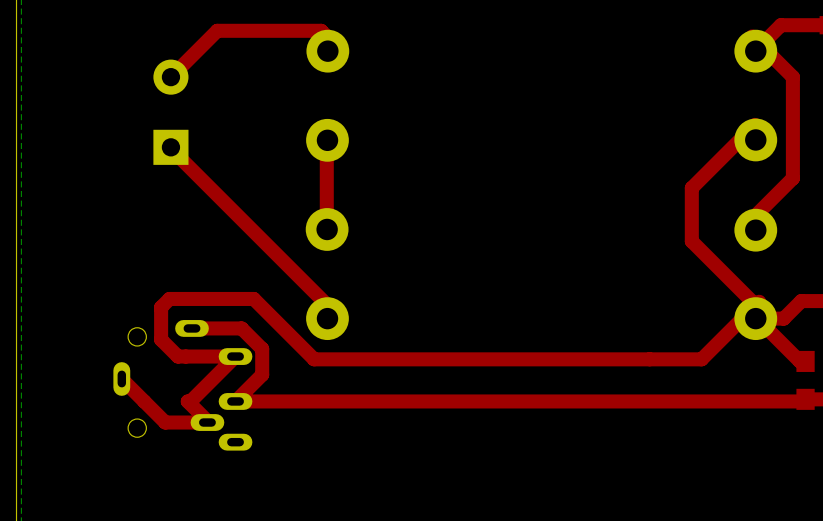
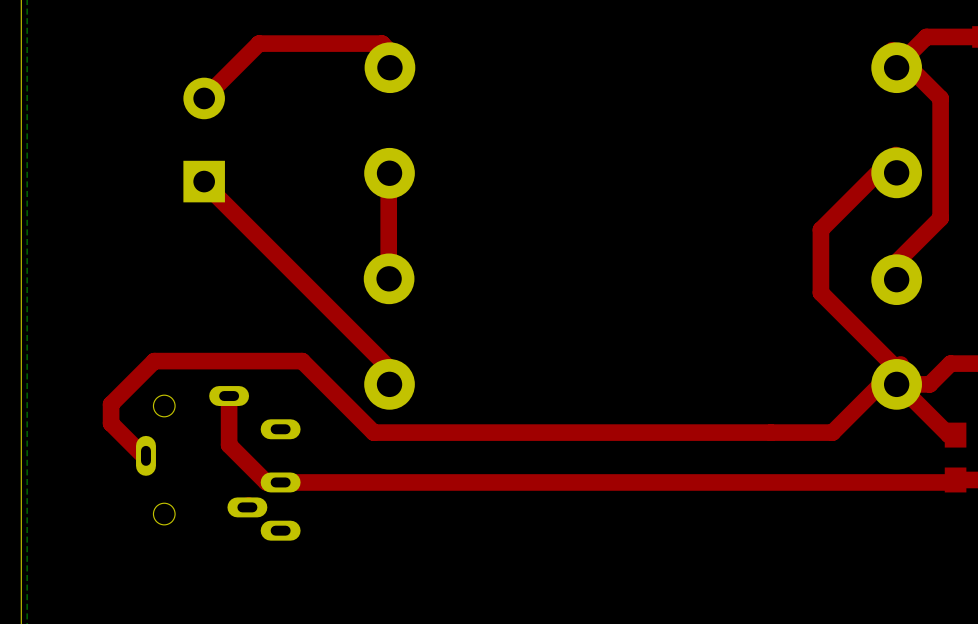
top track: (169, 298) (161, 307) (161, 339) (177, 356) (235, 356) (190, 401) (187, 401) (207, 421) -> (202, 361) (154, 361) (111, 404) (111, 423) (144, 456)
top track: (189, 328) (241, 328) (262, 348) (262, 374) (235, 401) -> (229, 394) (229, 445) (266, 482) (280, 482)
top track: (121, 378) (165, 422) (210, 422) -> none

